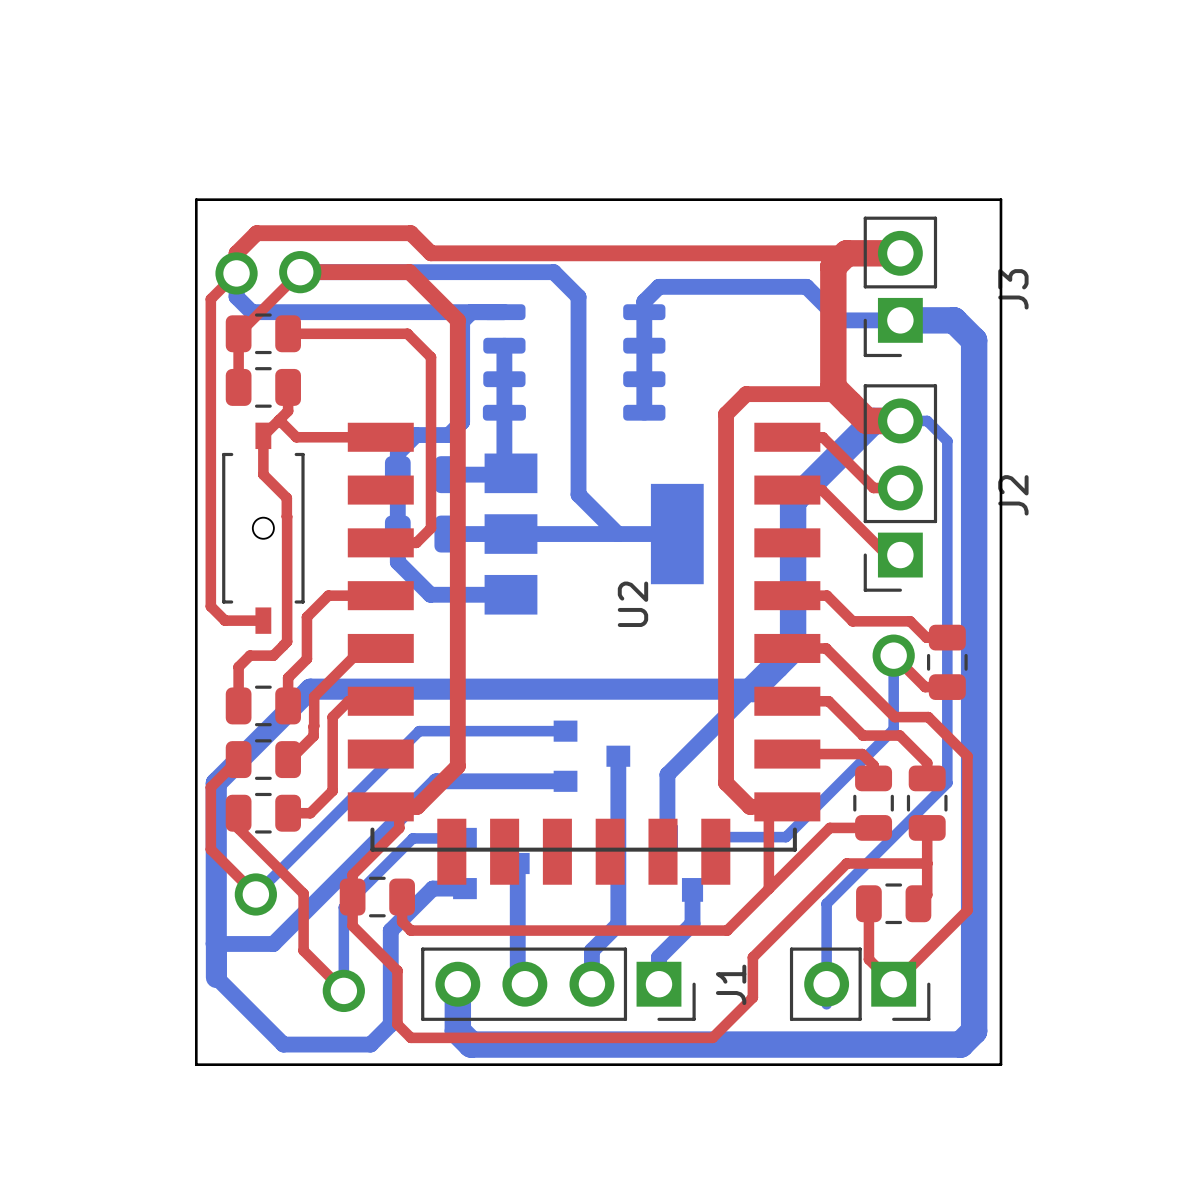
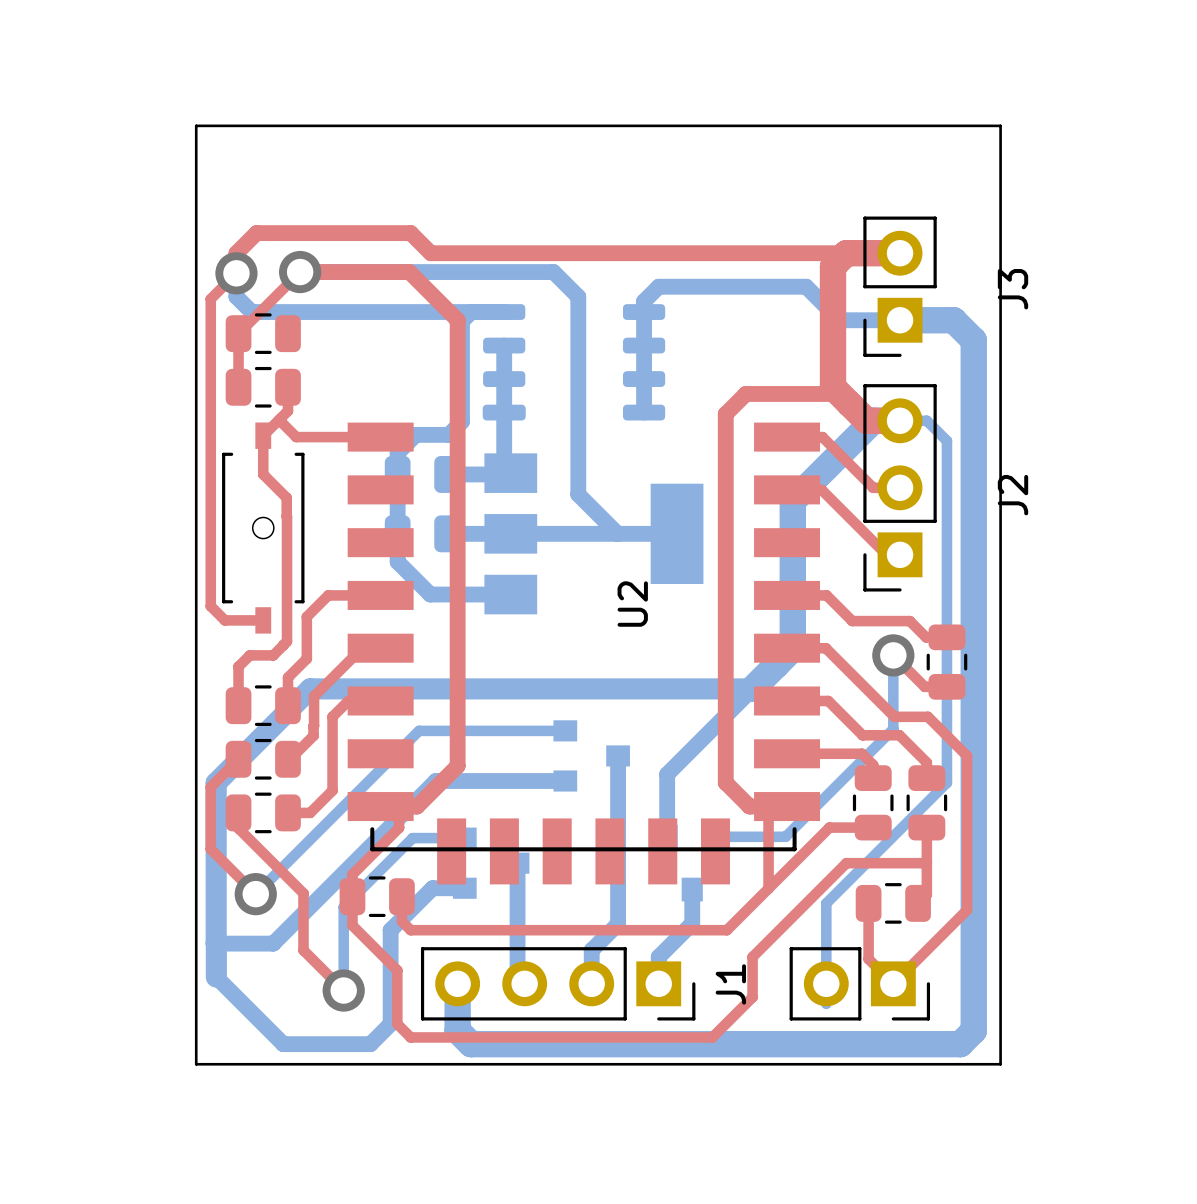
board edge: (196, 199) (1000, 199) -> (196, 199) (196, 125) (1000, 125) (1000, 199)
top track: (288, 333) (407, 333) (431, 357) (431, 528) (416, 542) (399, 542) -> none

